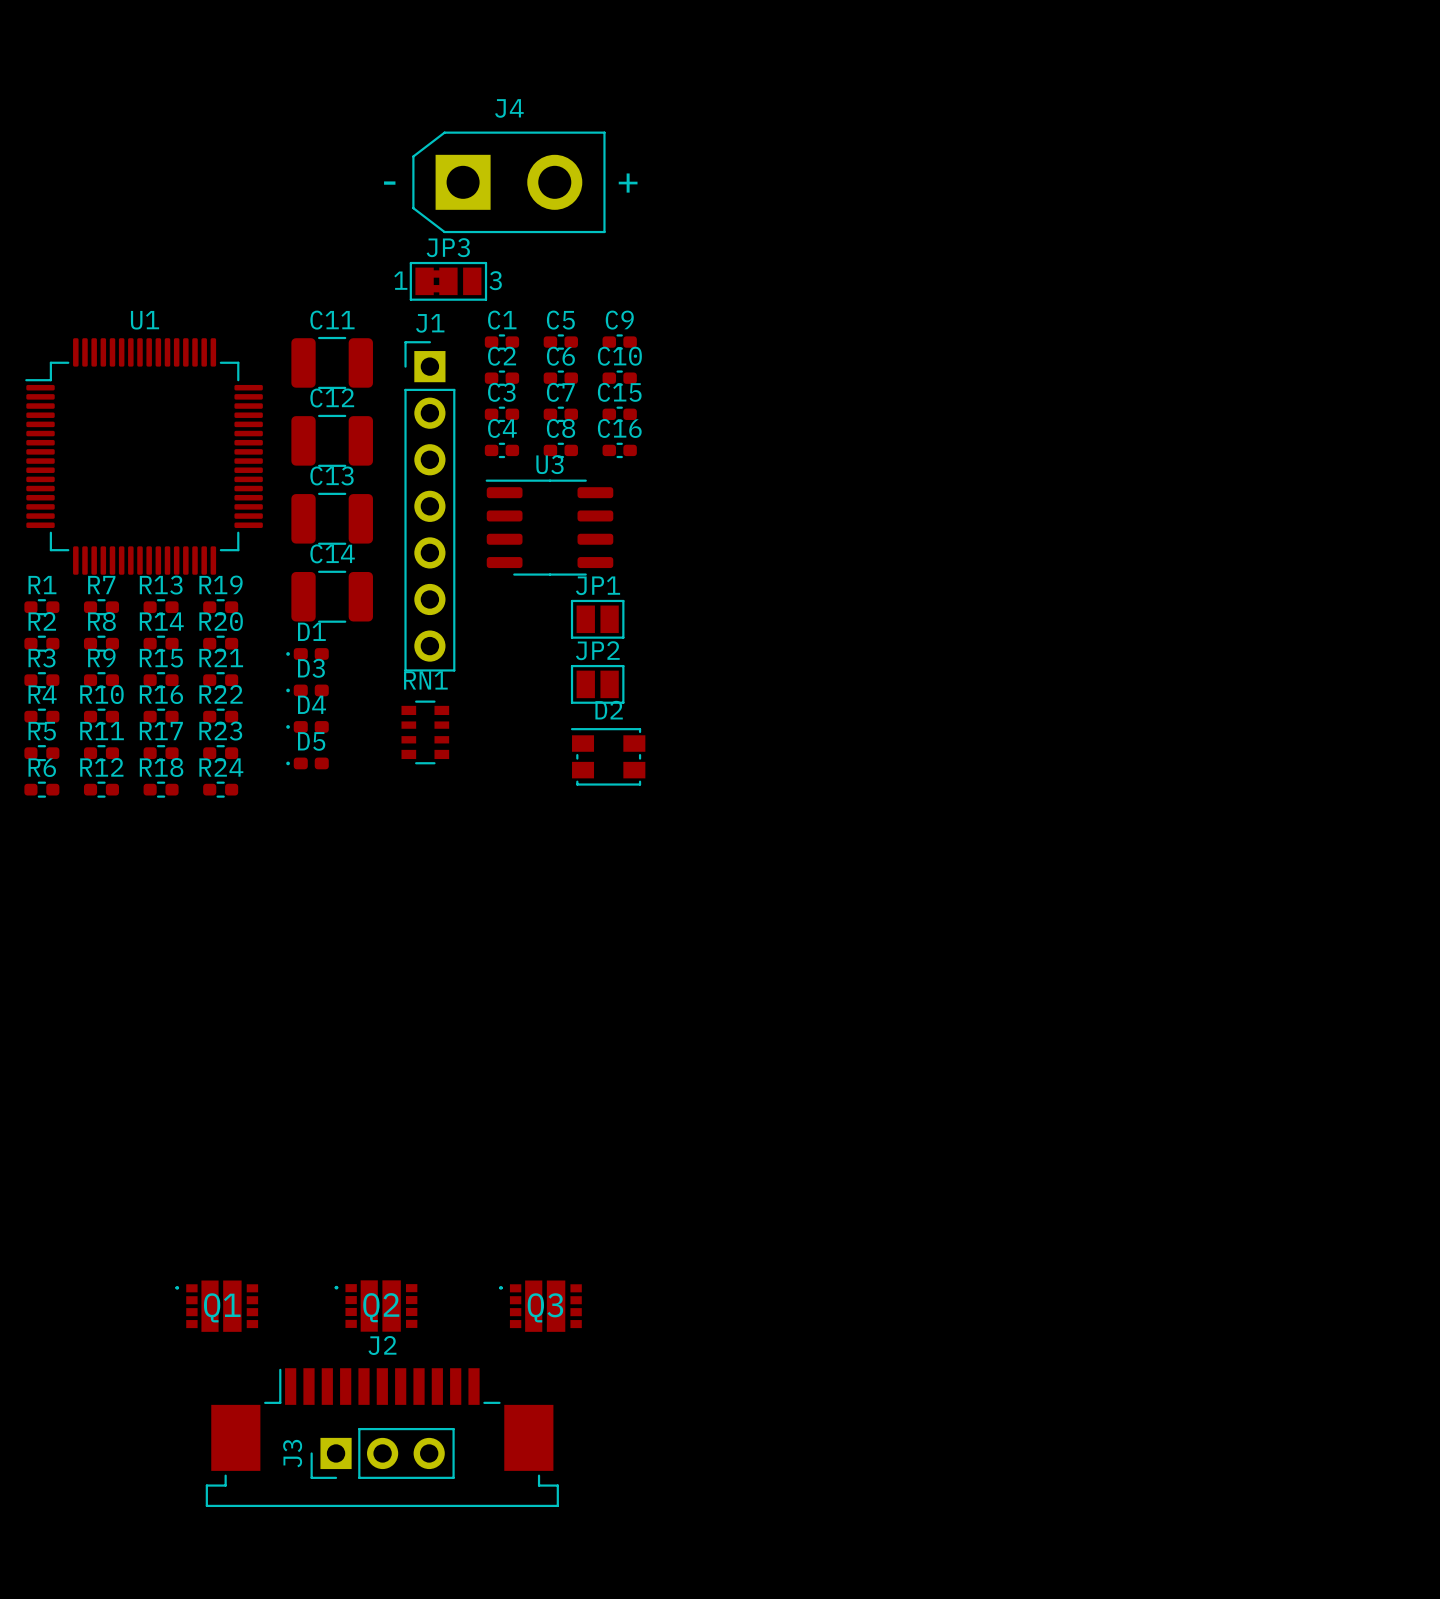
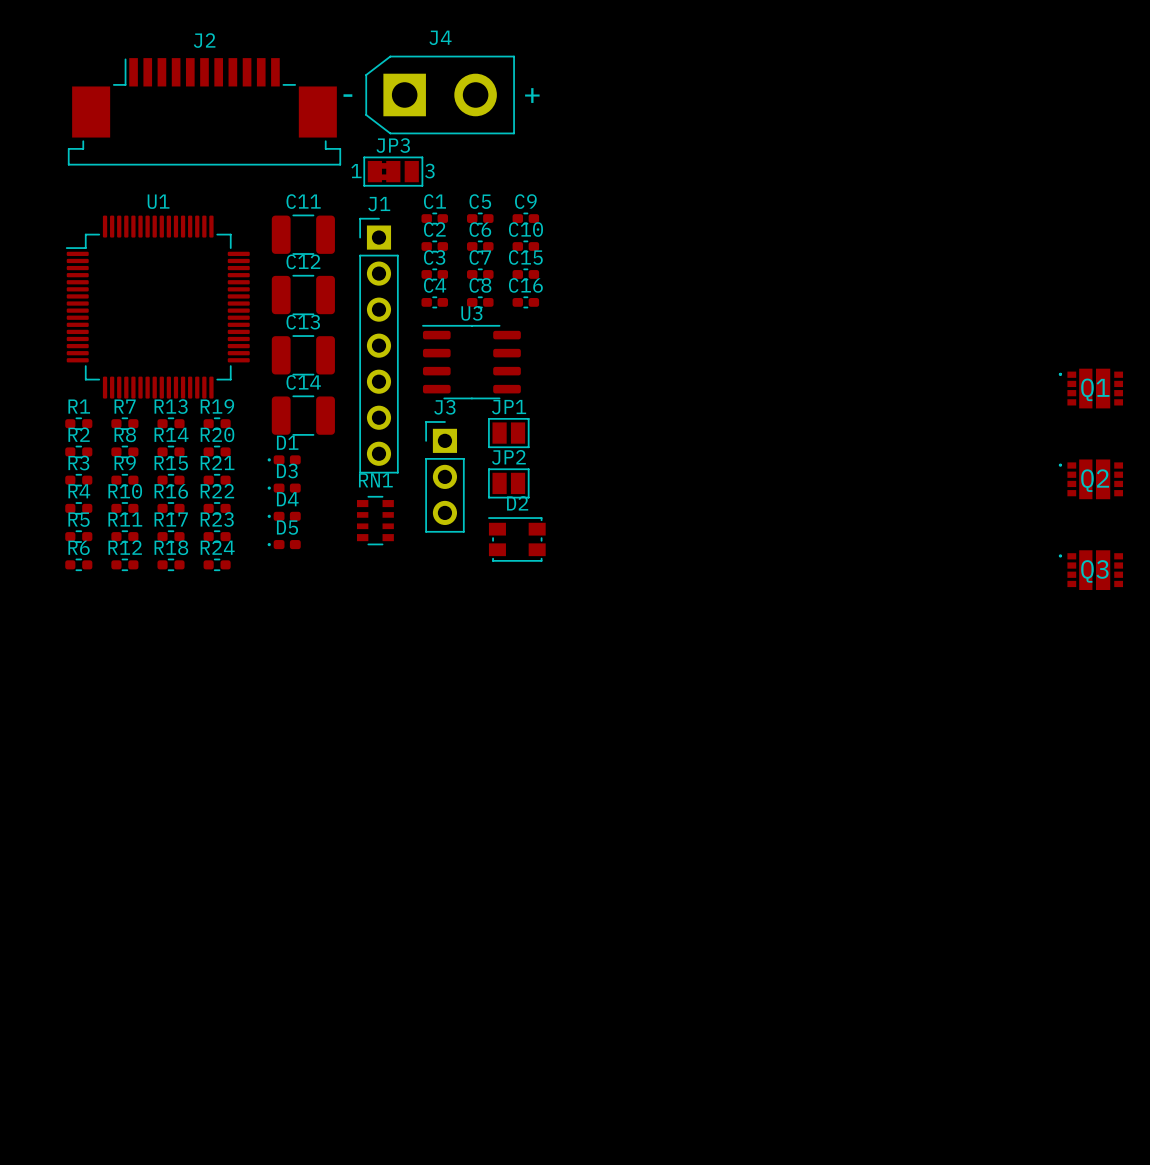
Q1 position: (216, 1306) -> (1091, 388)
Q2 position: (375, 1306) -> (1091, 479)
Q3 position: (540, 1306) -> (1091, 570)
J2 position: (382, 1437) -> (204, 111)
J3 rotation: 0° (382, 1453) -> 90° clockwise (444, 476)
J3 position: (382, 1453) -> (444, 476)

